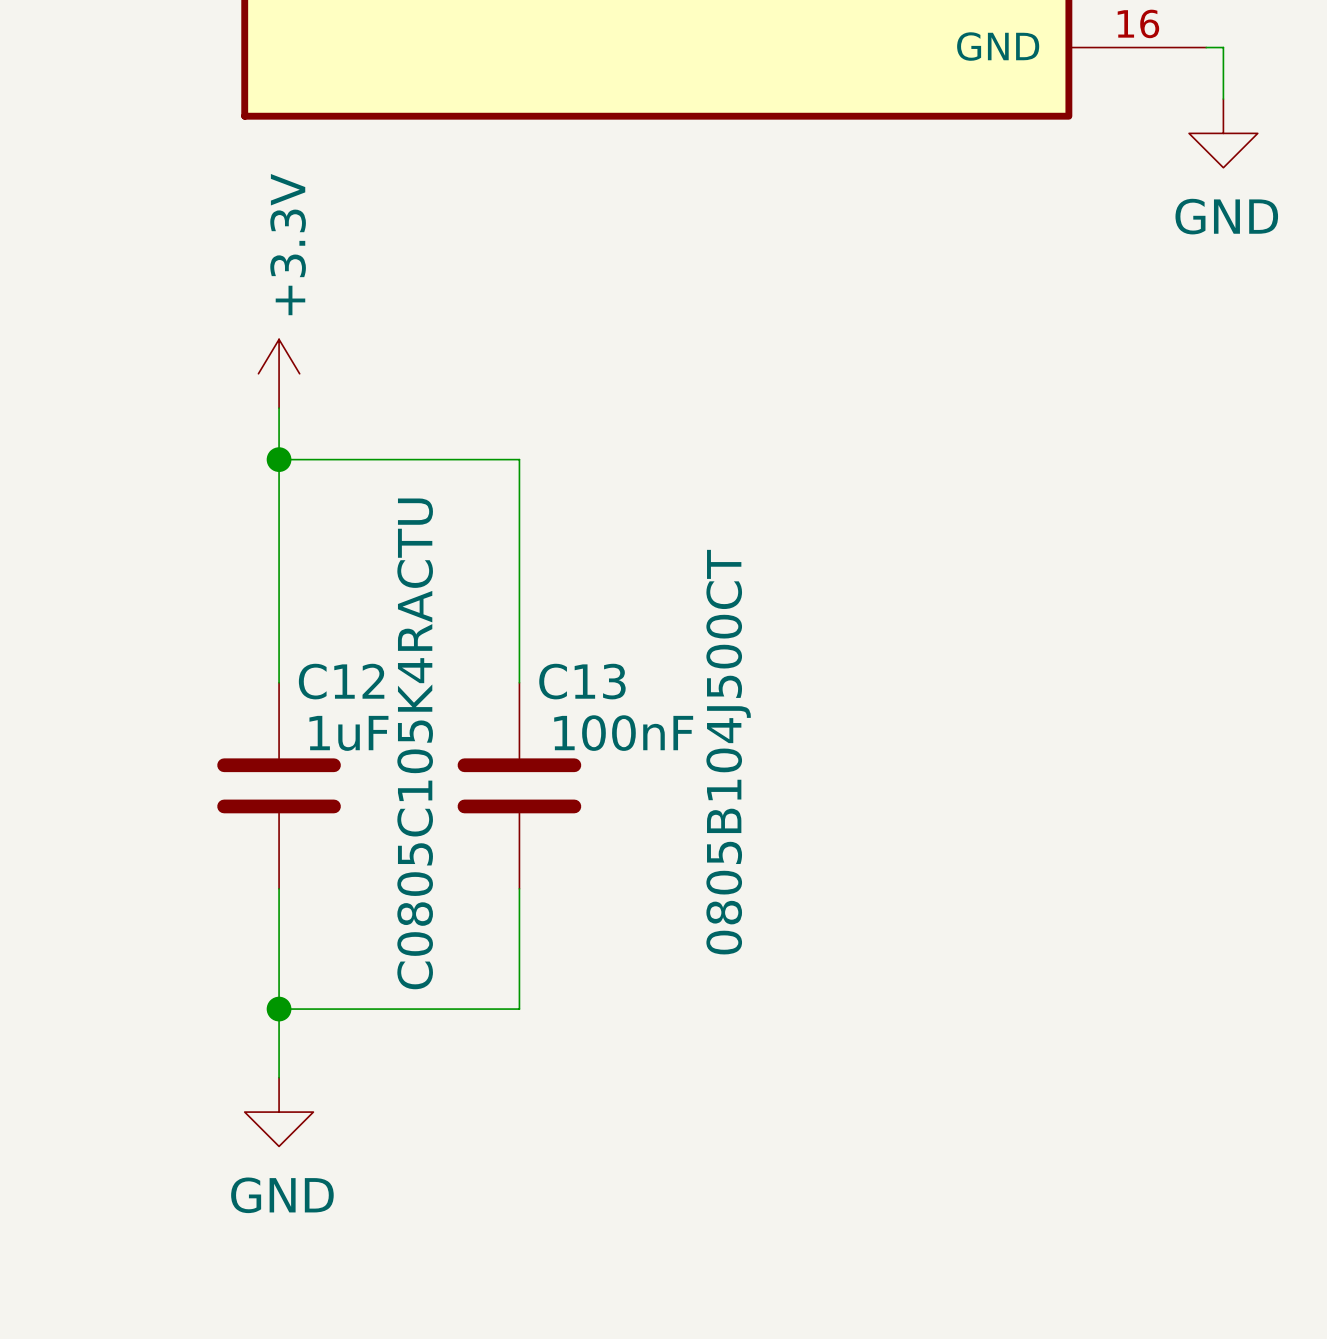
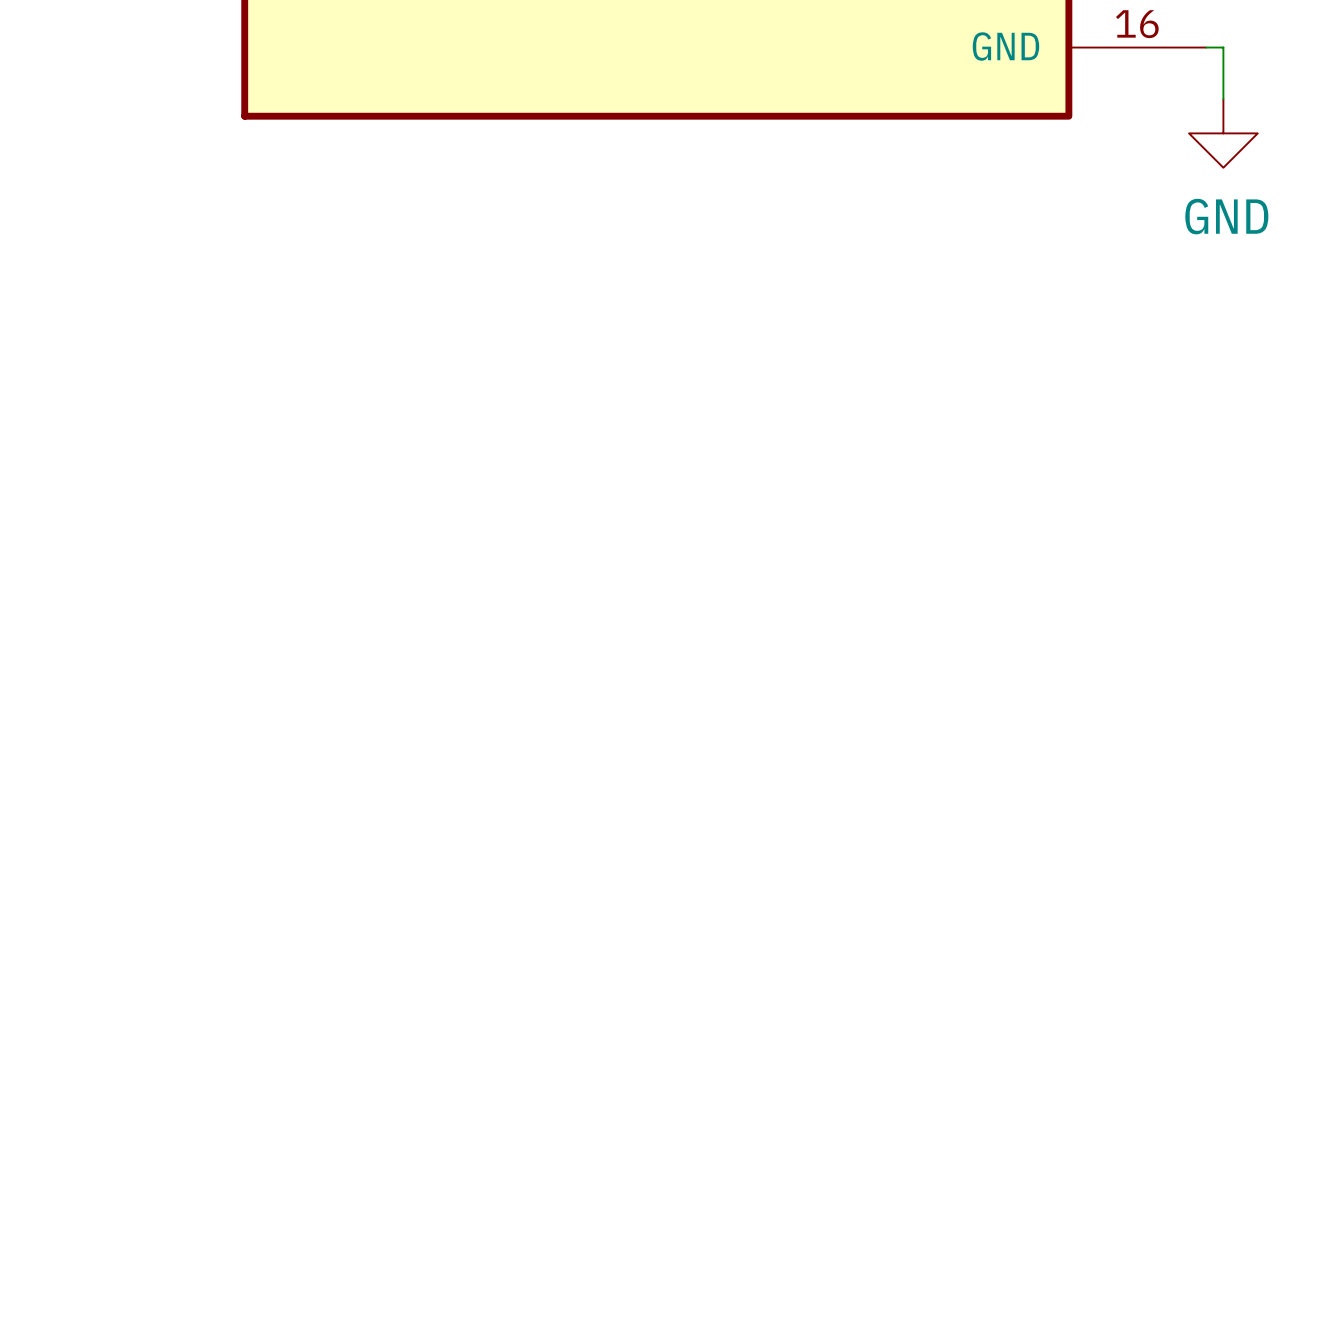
power symbol: +3.3V (279, 373) -> none
wire: (279, 408) (279, 682) -> none
wire: (279, 459) (519, 459) (519, 682) -> none
junction: (279, 459) -> none
C12: C0805C105K4RACTU (279, 785) -> none
C13: 0805B104J500CT (519, 785) -> none
wire: (279, 888) (279, 1077) -> none
wire: (519, 888) (519, 1009) (279, 1009) -> none
junction: (279, 1009) -> none
power symbol: GND (279, 1112) -> none

